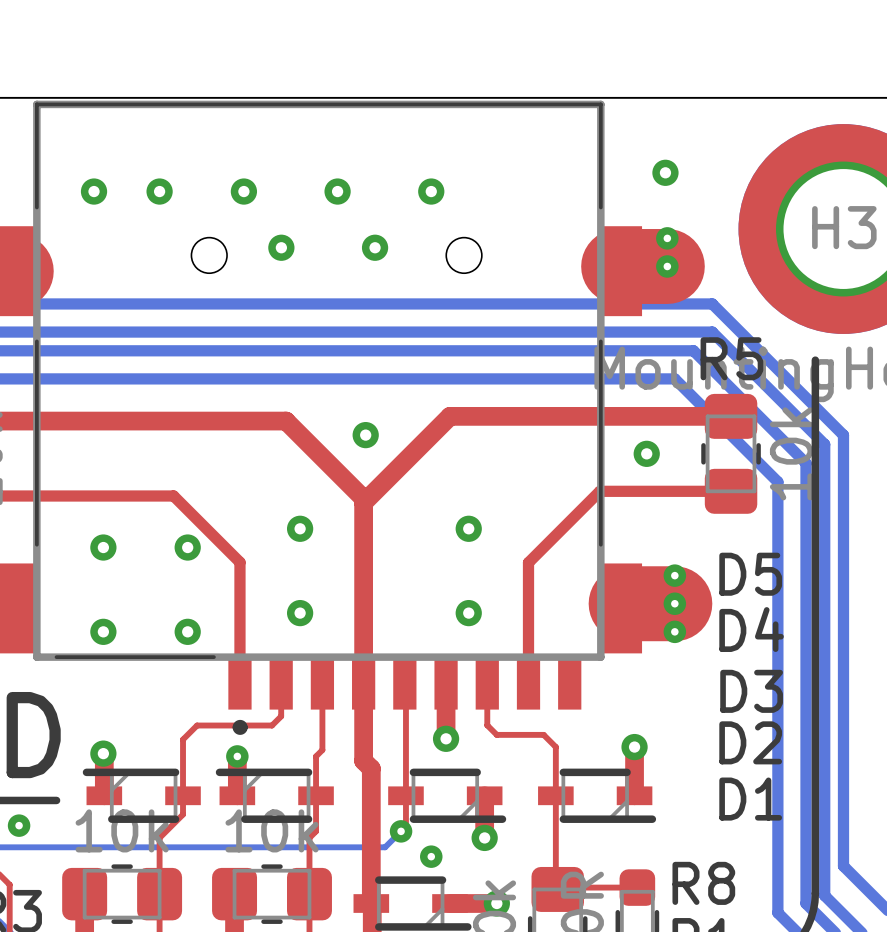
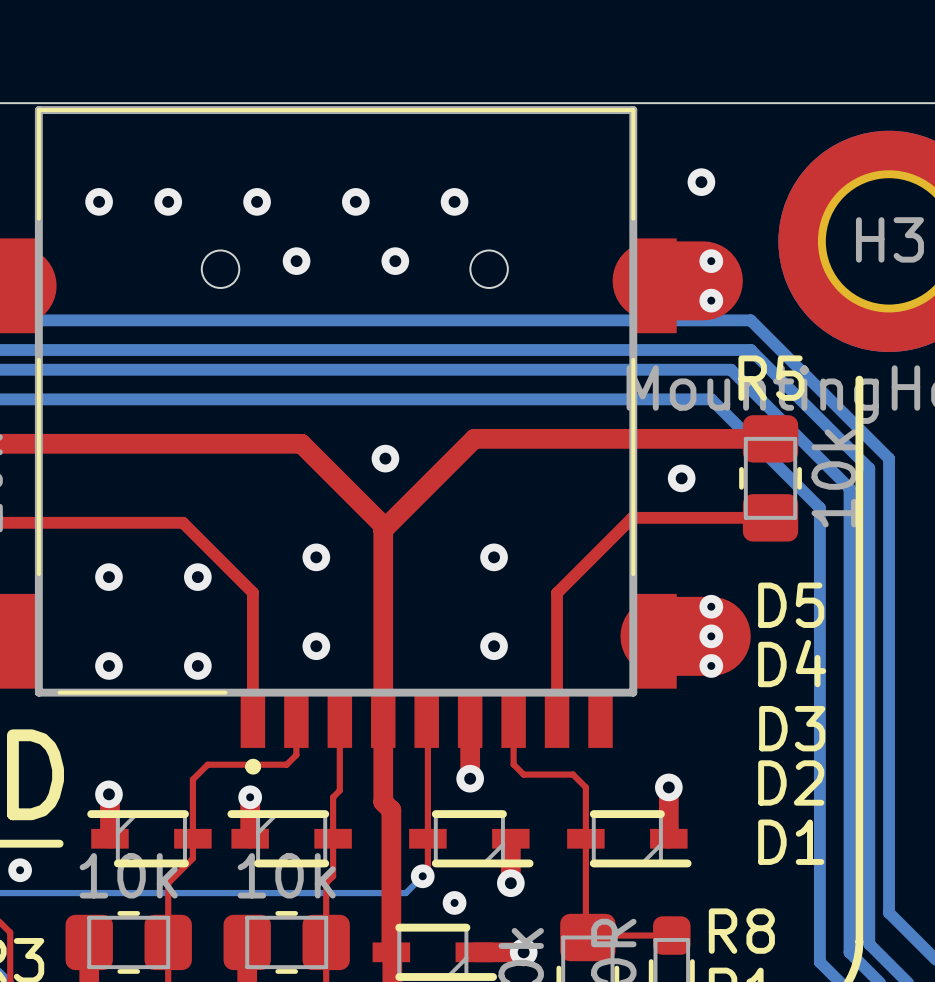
via: (667, 238) -> none
via: none -> (711, 261)
via: (667, 266) -> none
via: none -> (711, 300)

